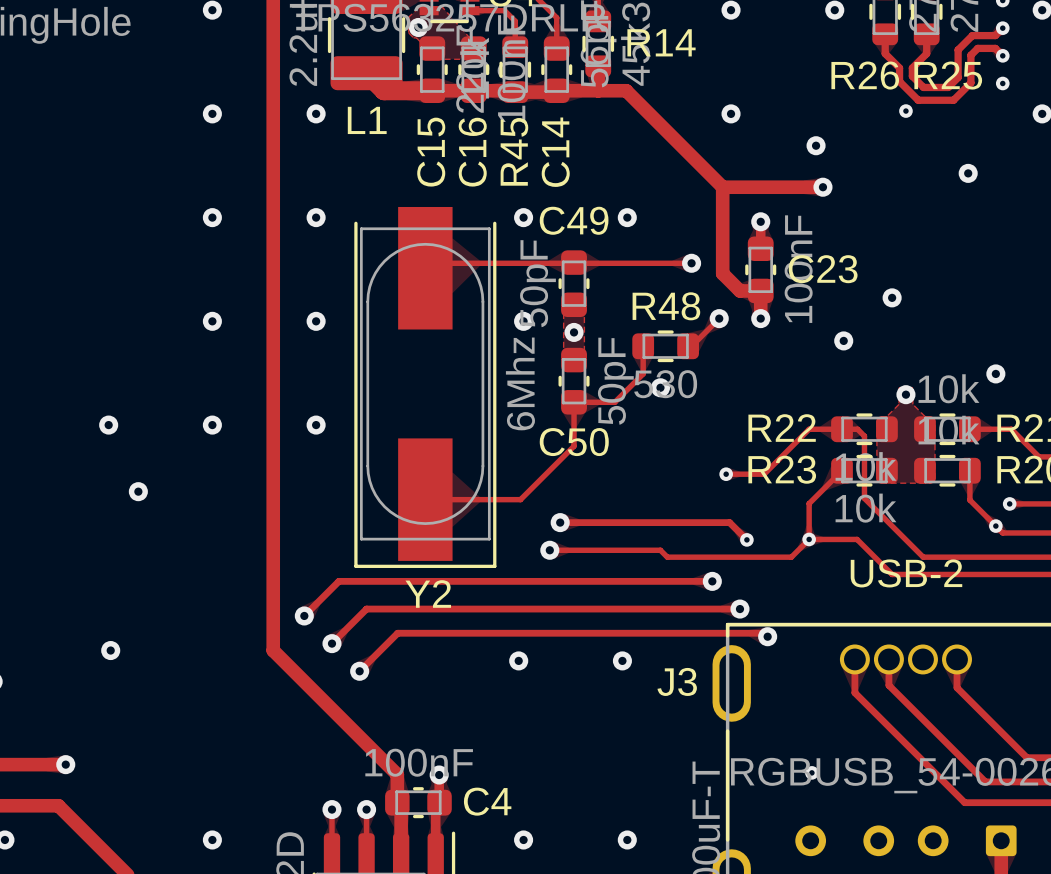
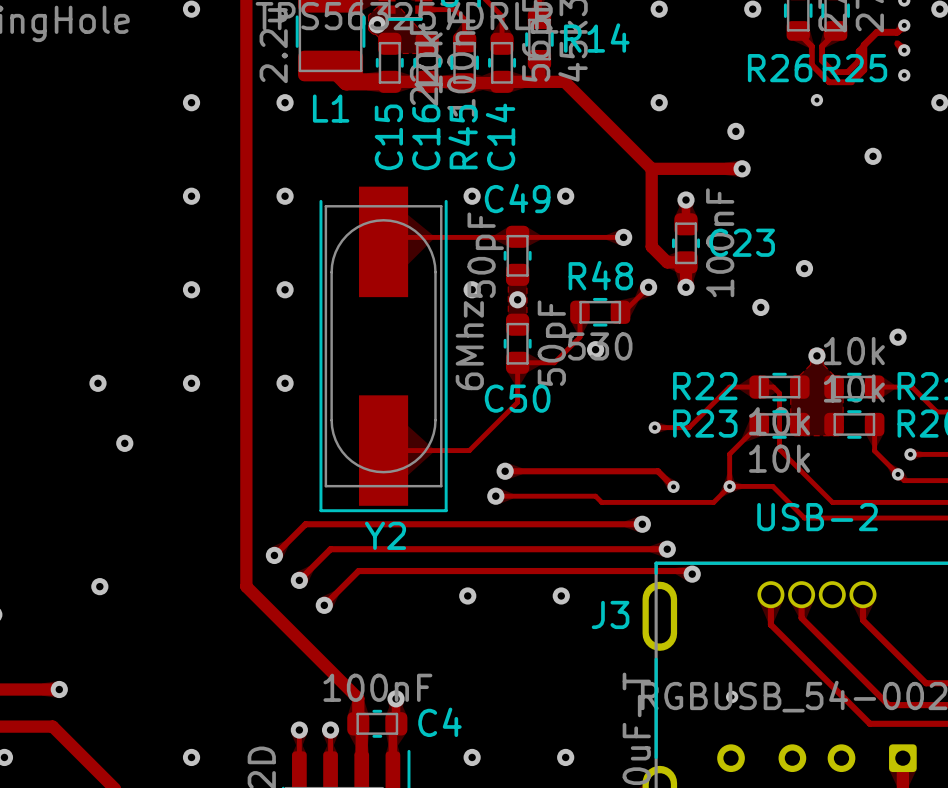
track: (885, 34) (885, 53) (899, 68) (899, 81) (918, 100) (953, 100) (970, 82) (970, 55) (977, 48) (995, 48) -> none
track: (926, 34) (926, 53) (912, 68) (912, 76) (923, 87) (948, 87) -> none
track: none -> (897, 32) (876, 32) (858, 51) (858, 61) (847, 72) (833, 72) (822, 60) (822, 46) (835, 32)
track: none -> (798, 32) (811, 46) (811, 64) (829, 82) (851, 82)

